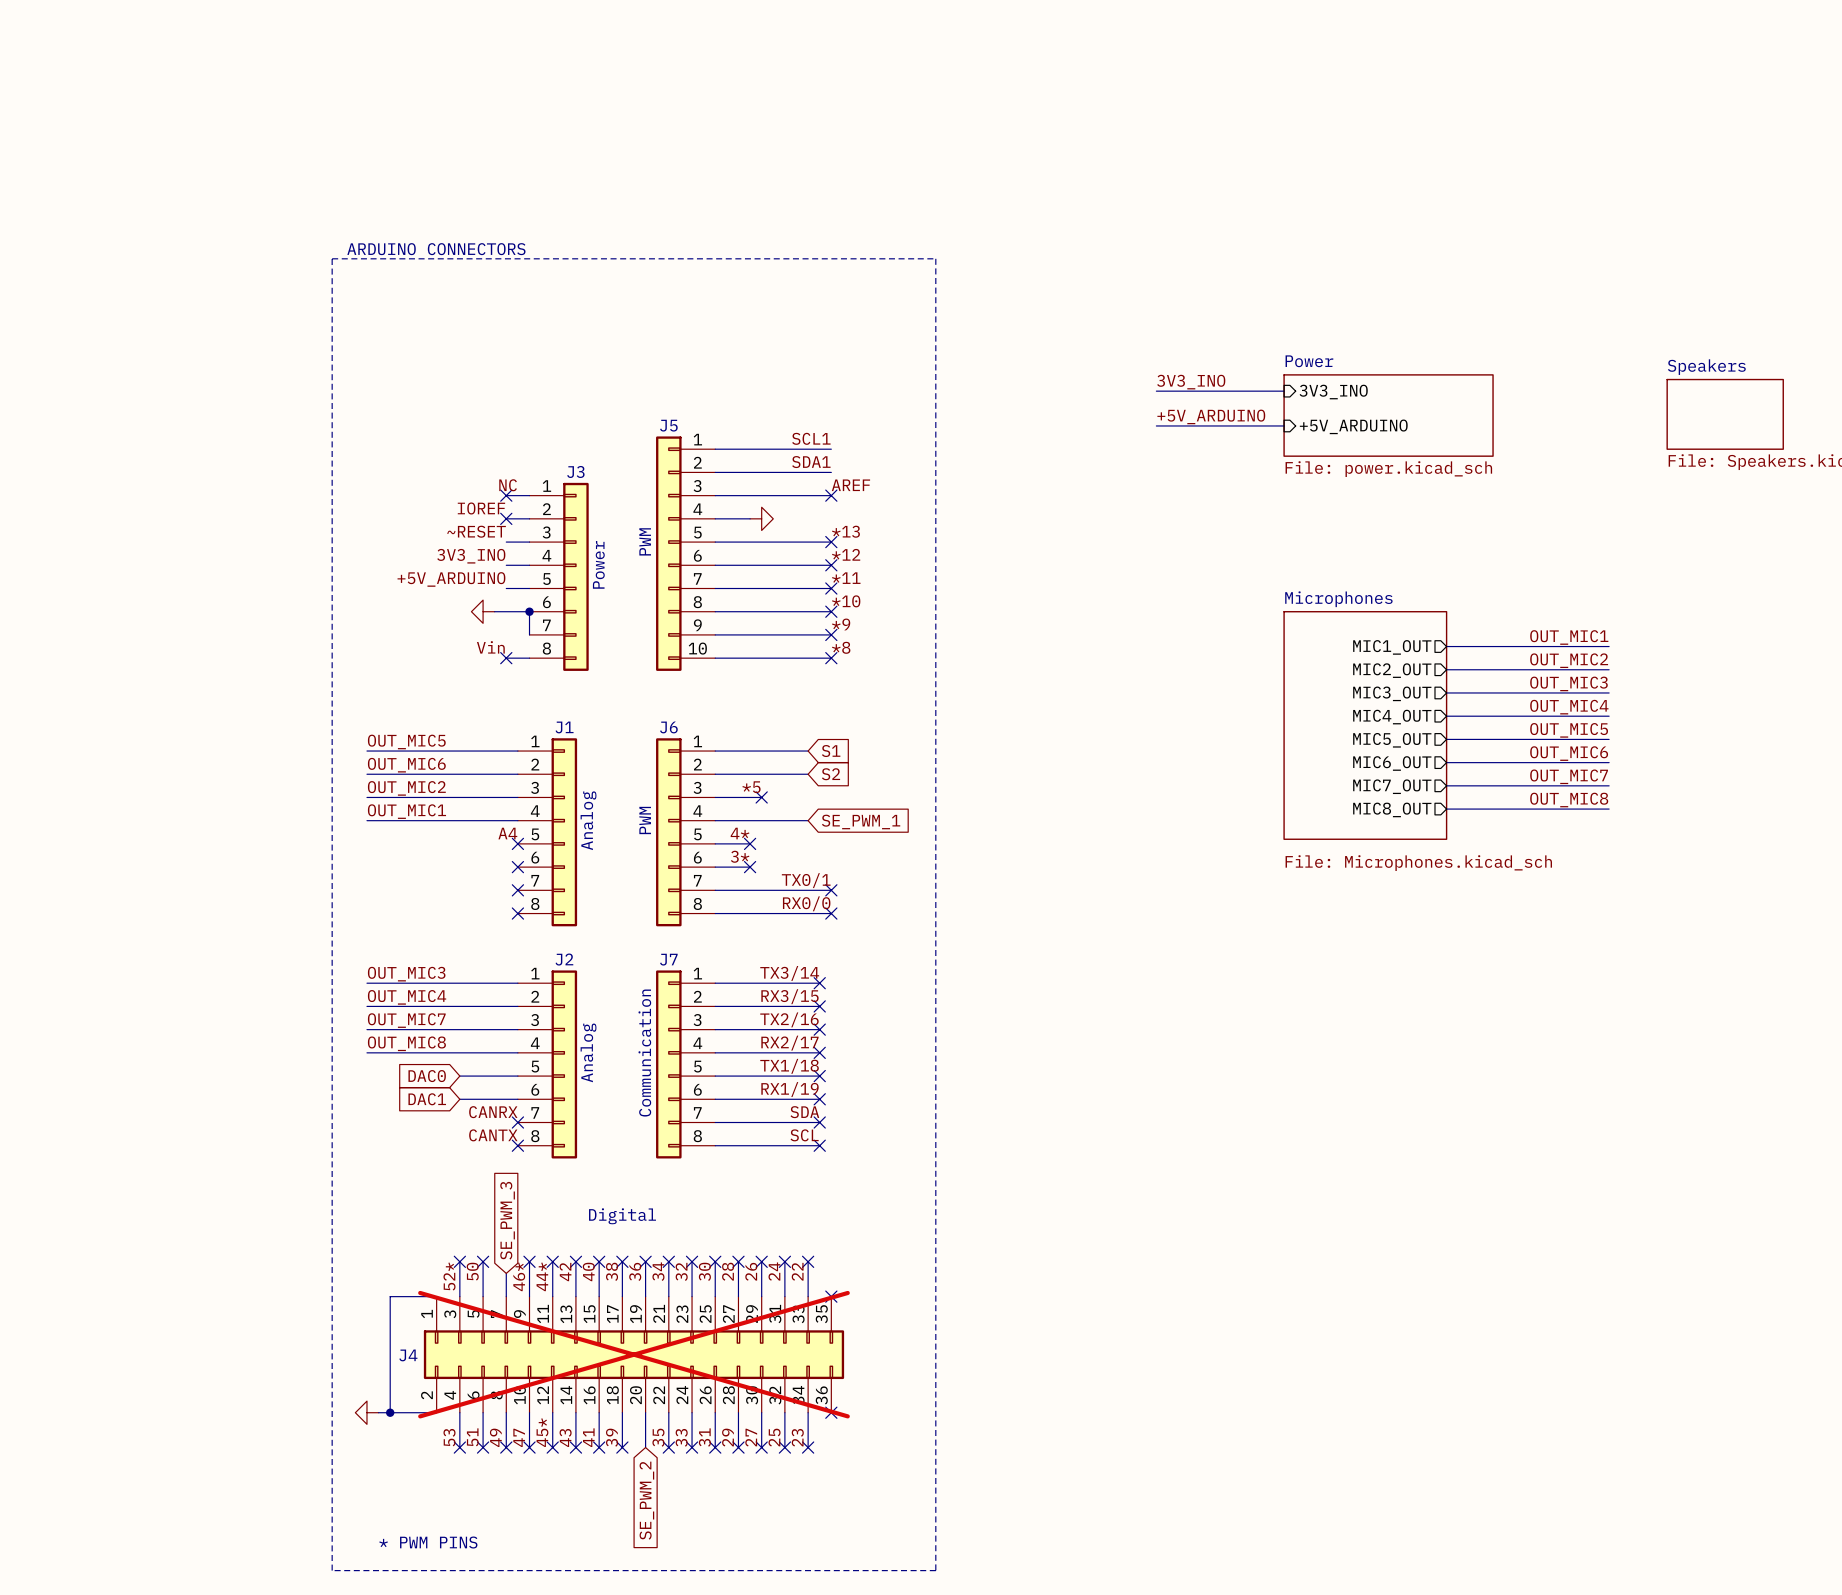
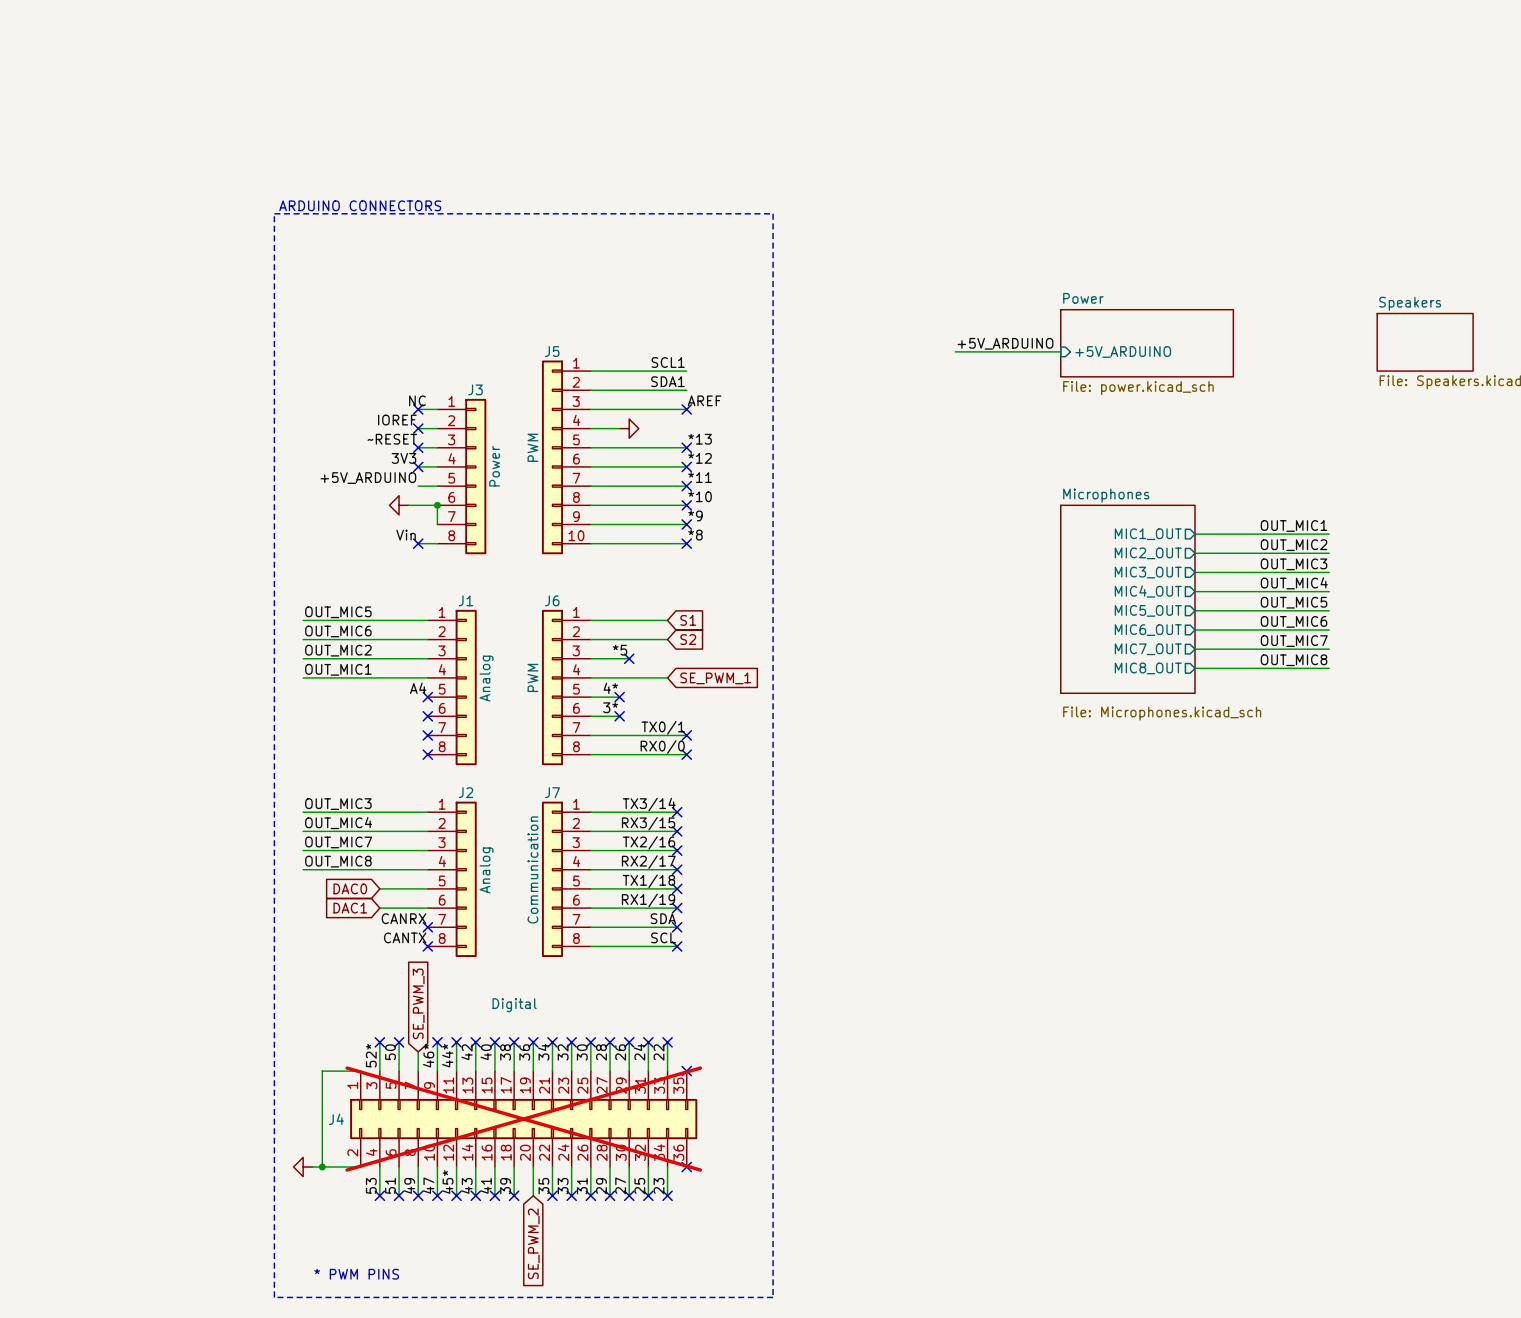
label: 3V3_INO (1191, 382) -> none
wire: (1156, 391) (1284, 391) -> none
sheet pin: 3V3_INO (1333, 392) -> none
no-connect mark: none -> (418, 447)
label: 3V3_INO (471, 556) -> 3V3 (404, 458)
no-connect mark: none -> (418, 466)

